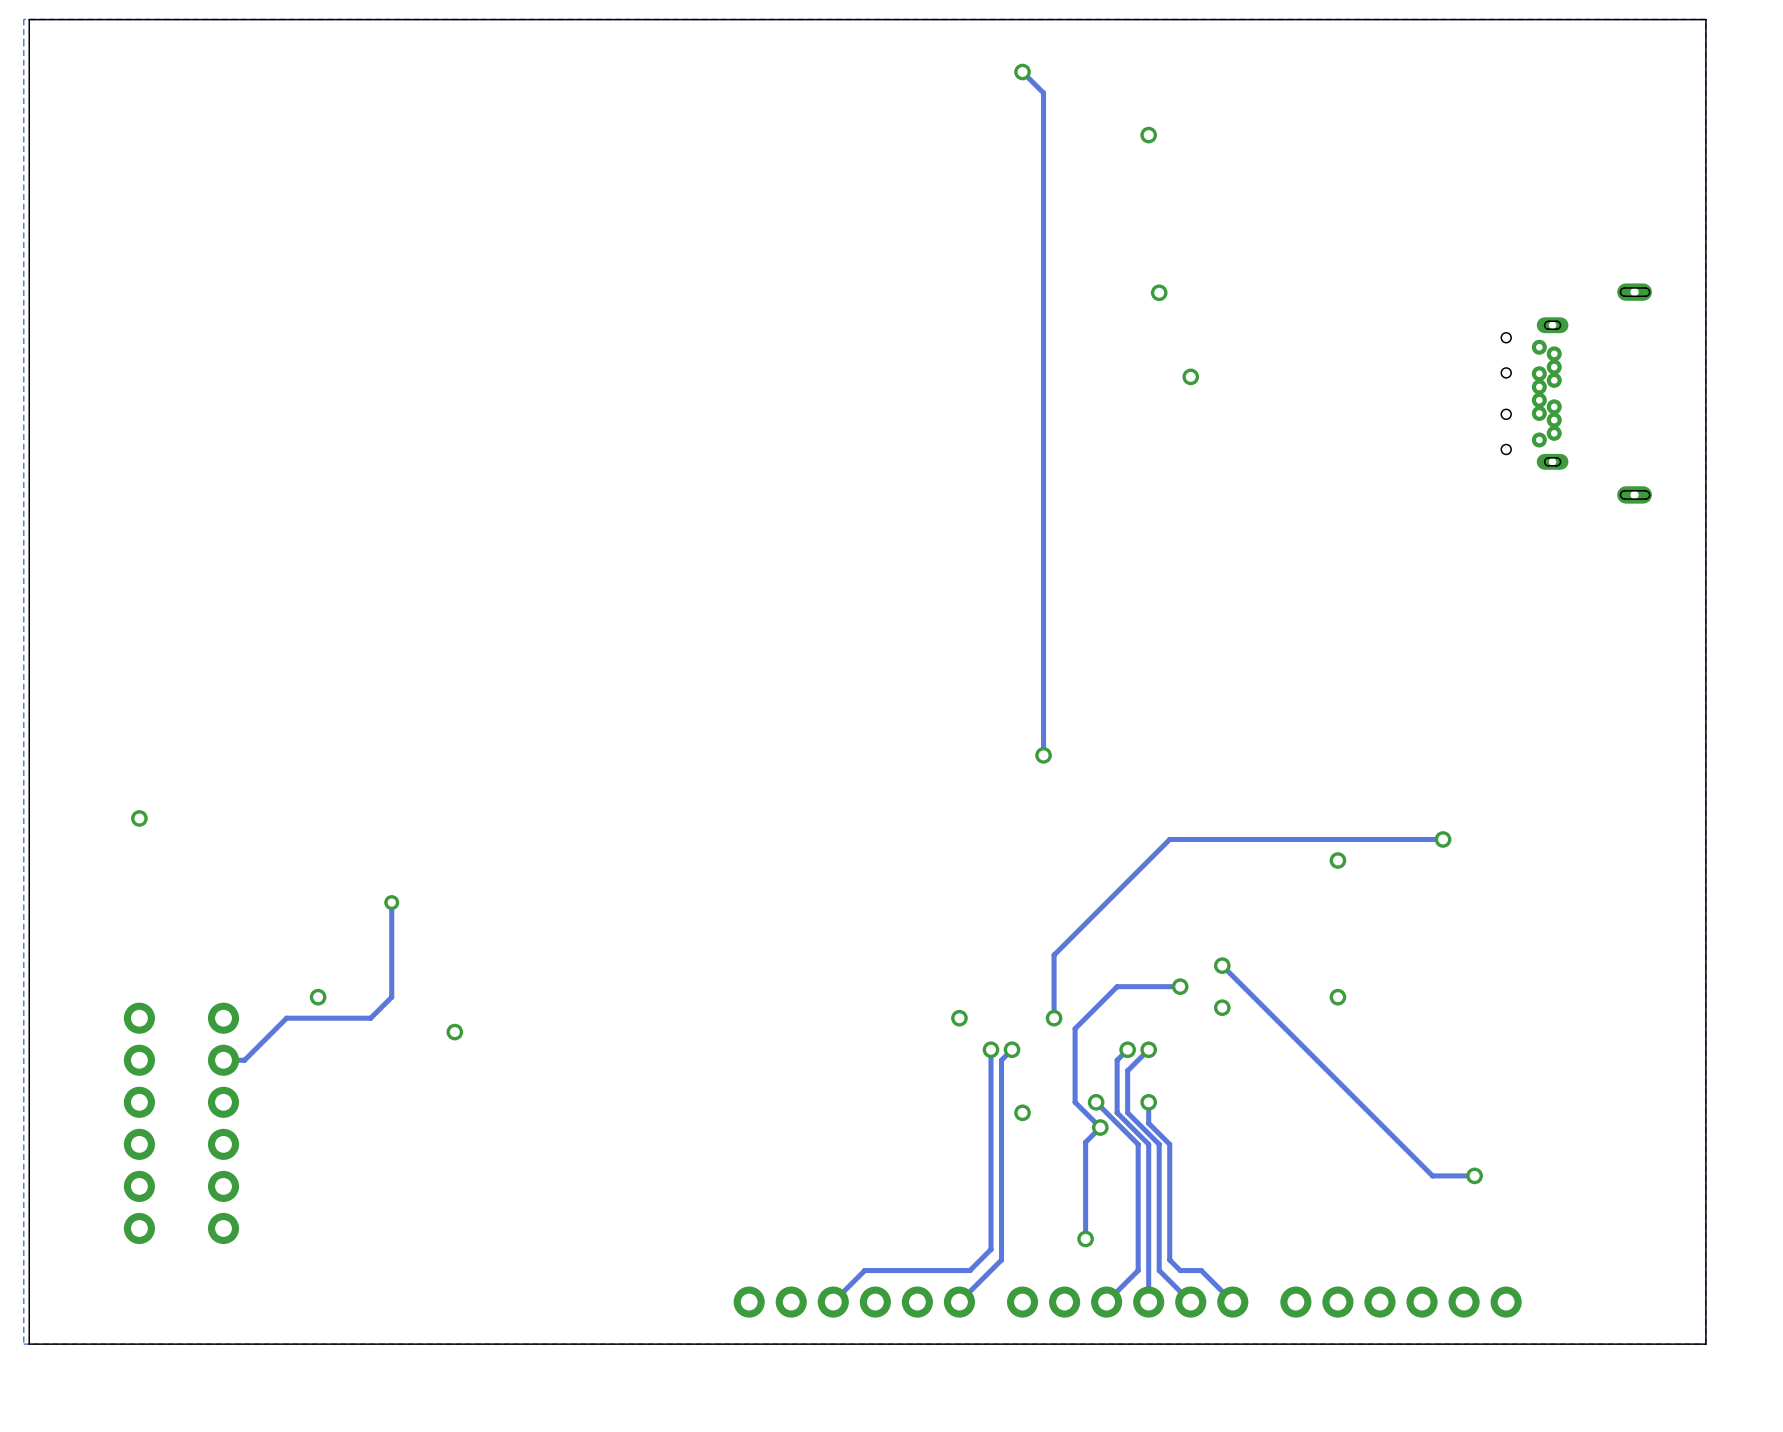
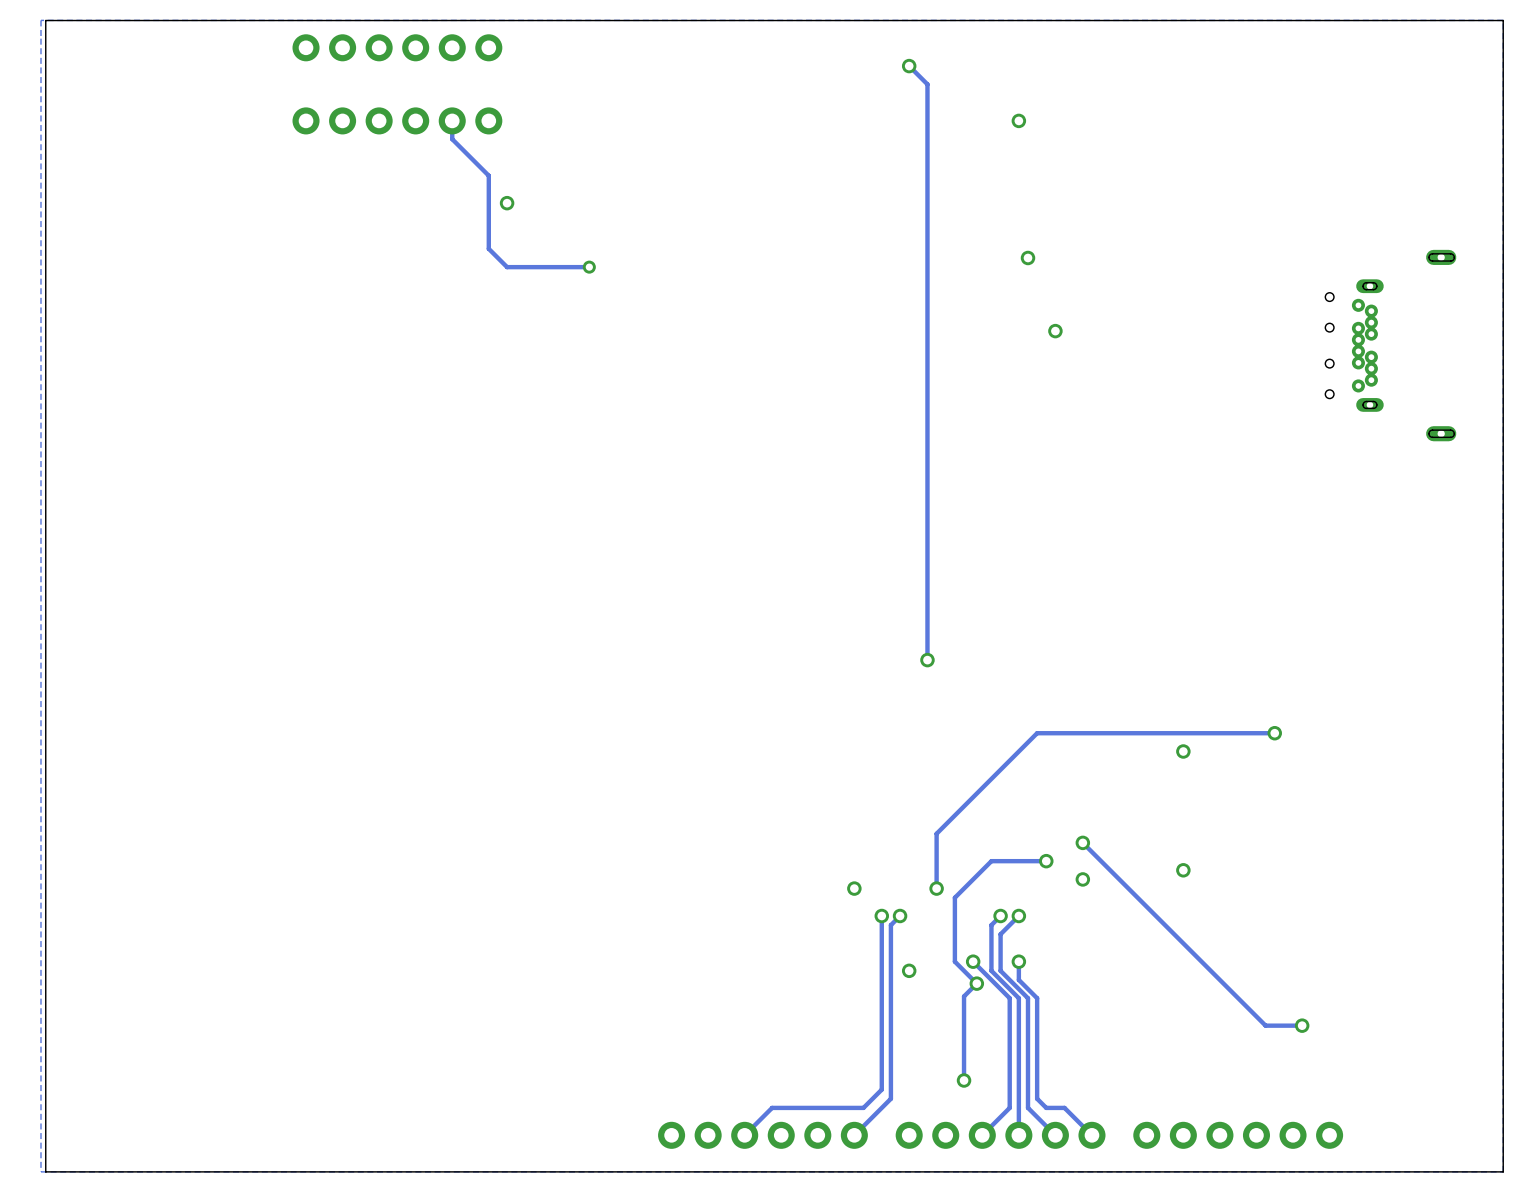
part: none -> (397, 47)
part: none -> (397, 120)
track: none -> (452, 120) (452, 139) (488, 175) (488, 248) (507, 267) (589, 267)
via: none -> (507, 203)
via: none -> (589, 267)
via: (139, 818) -> none
track: (391, 902) (391, 997) (370, 1018) (286, 1018) (244, 1060) (223, 1060) -> none
via: (391, 902) -> none
via: (318, 997) -> none
via: (454, 1032) -> none
part: (139, 1123) -> none
part: (223, 1123) -> none

